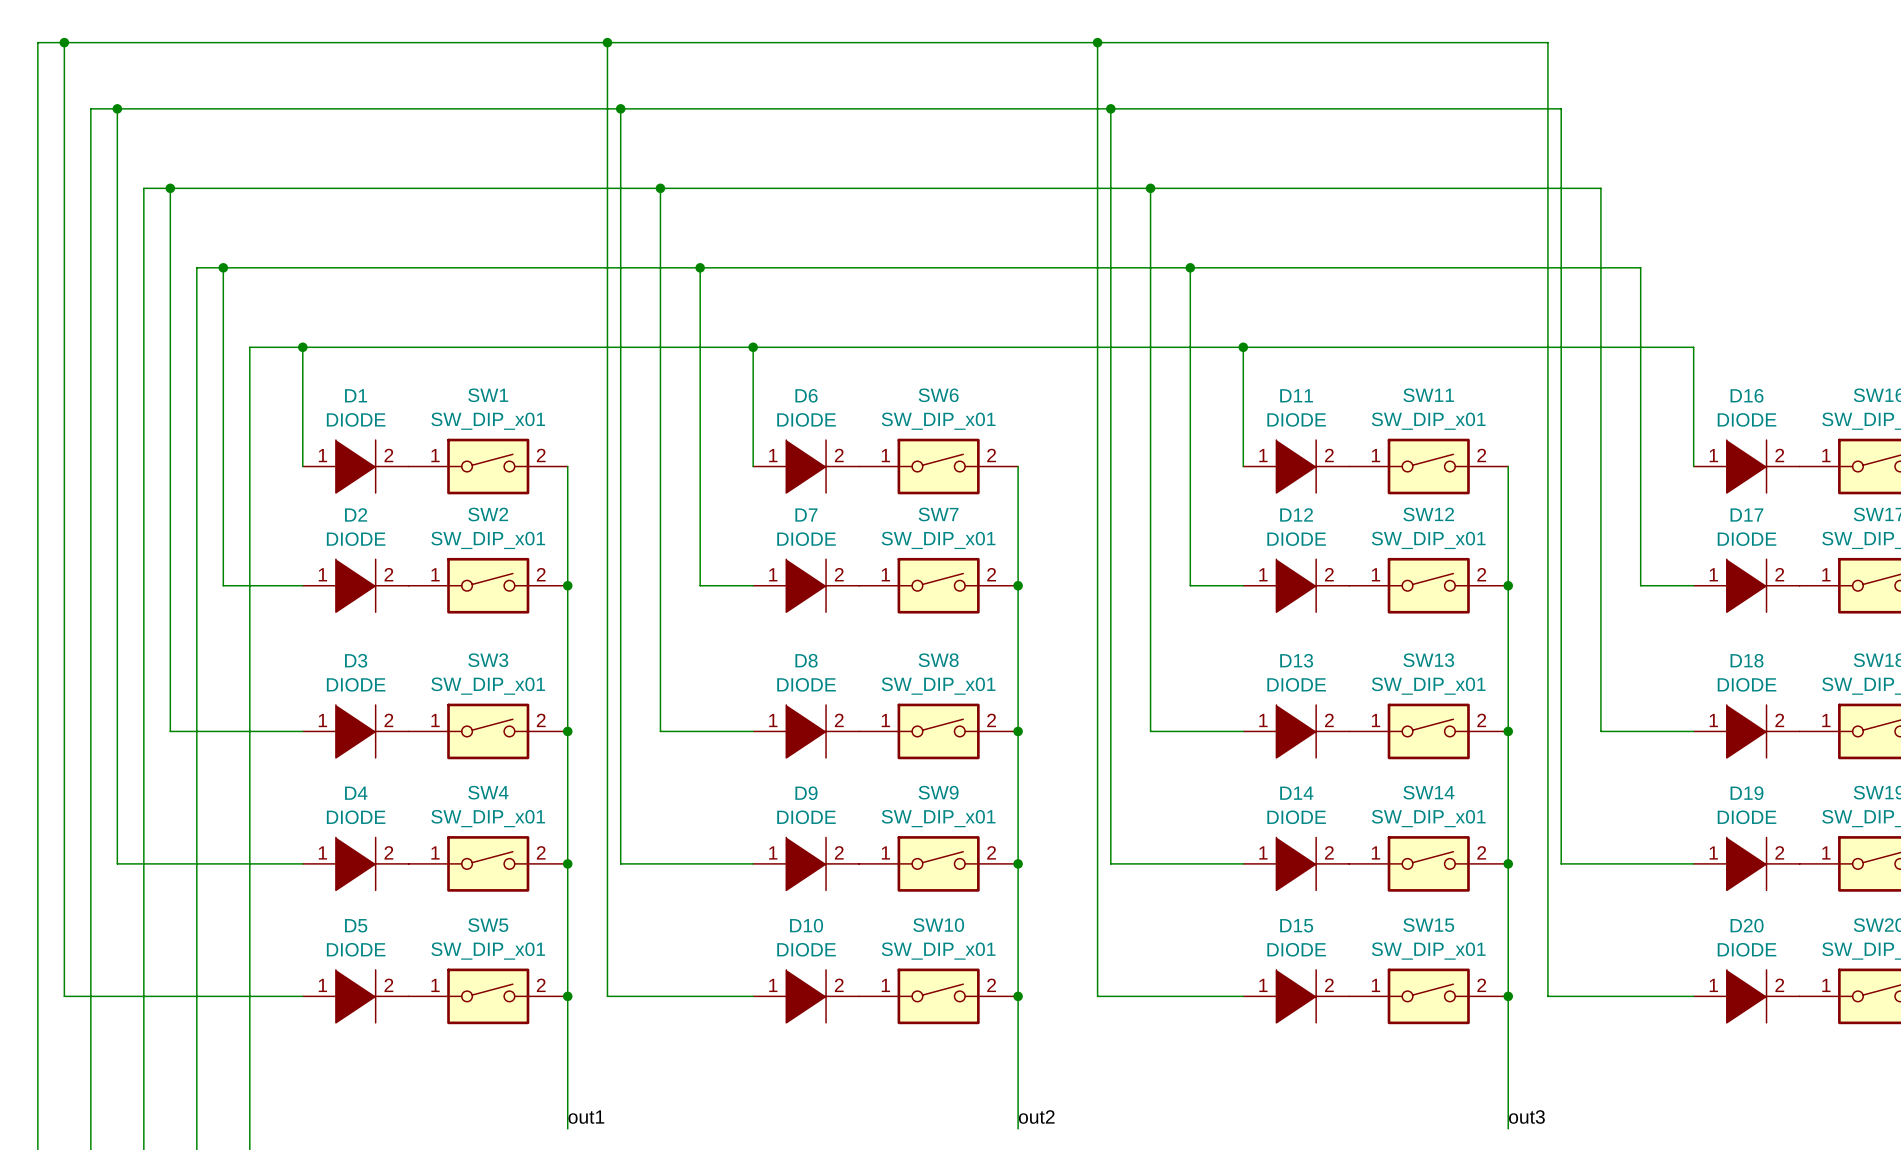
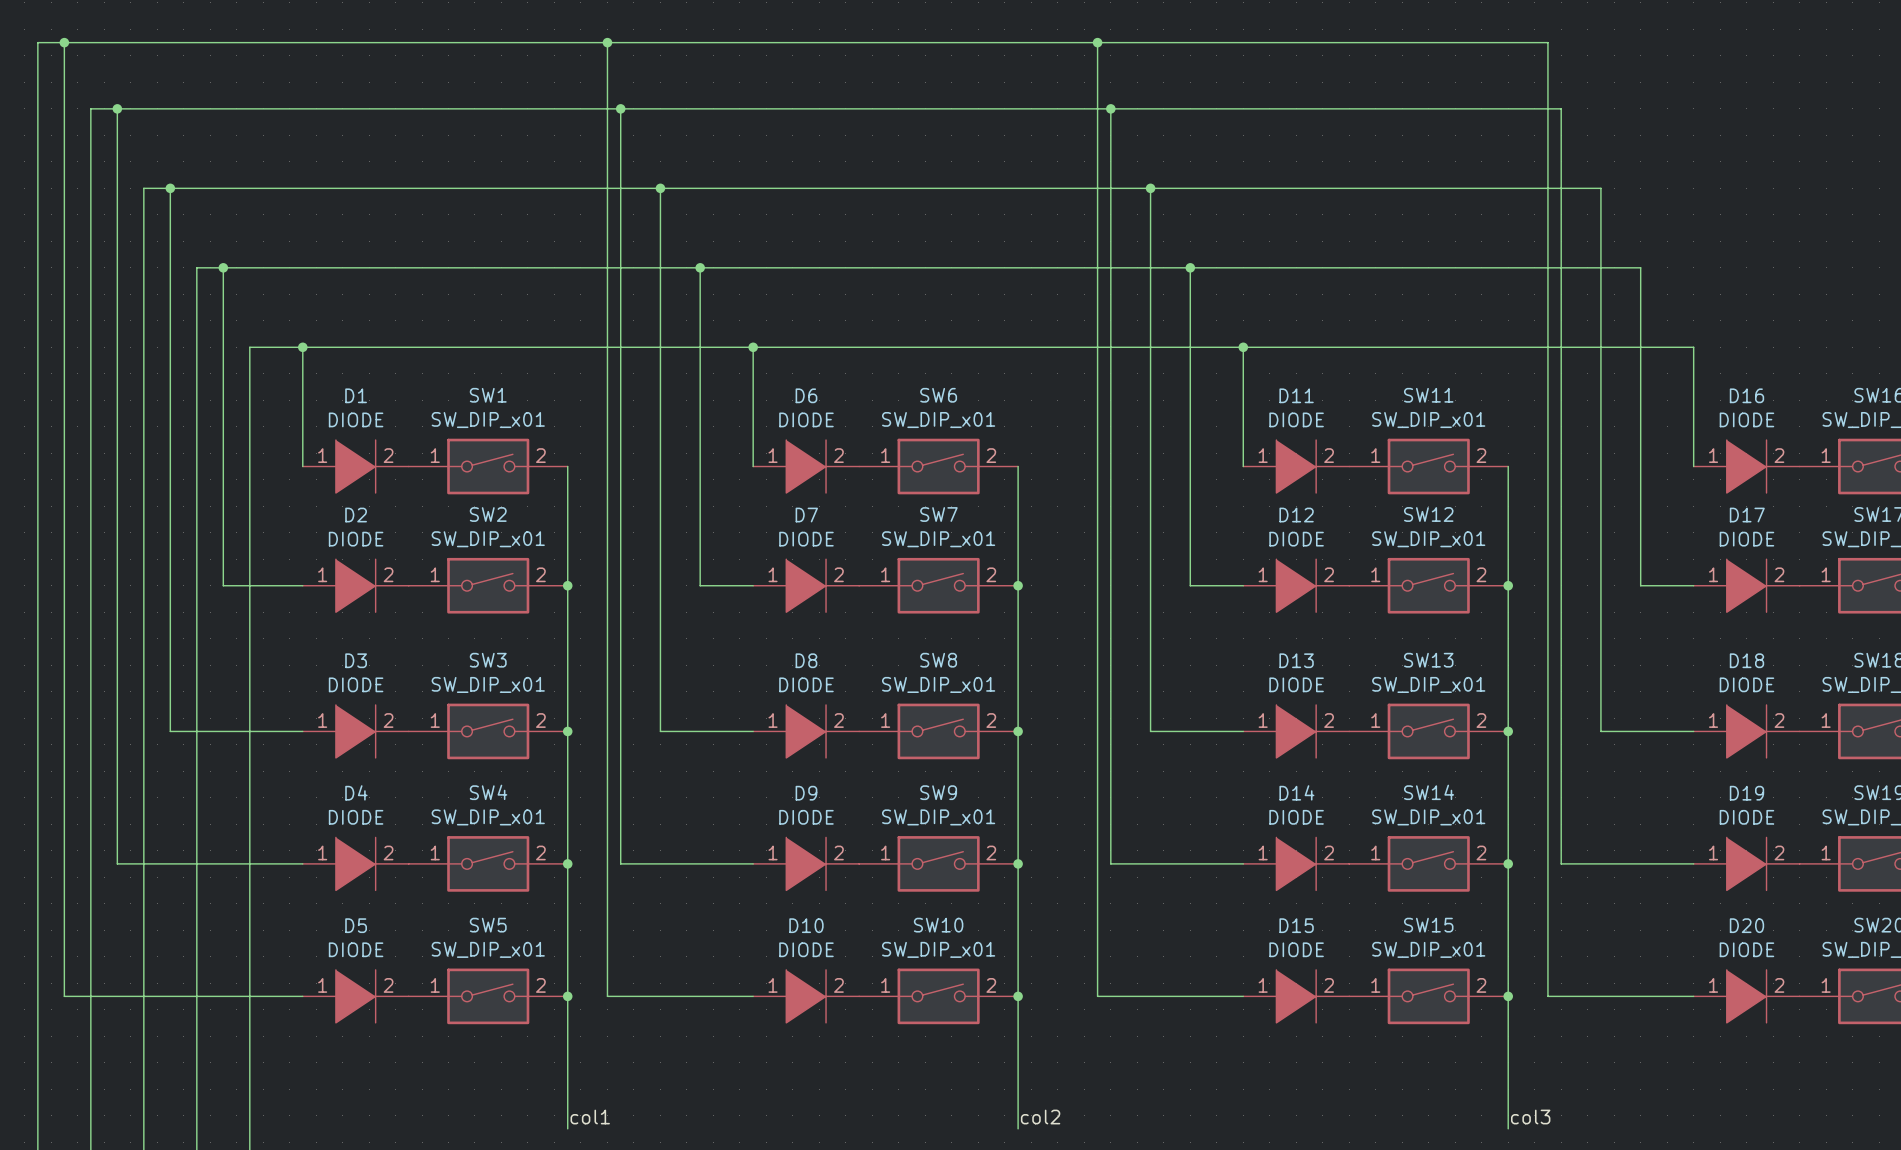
label: out1 (586, 1117) -> col1 (590, 1117)
label: out2 (1036, 1117) -> col2 (1040, 1117)
label: out3 (1526, 1117) -> col3 (1530, 1117)

